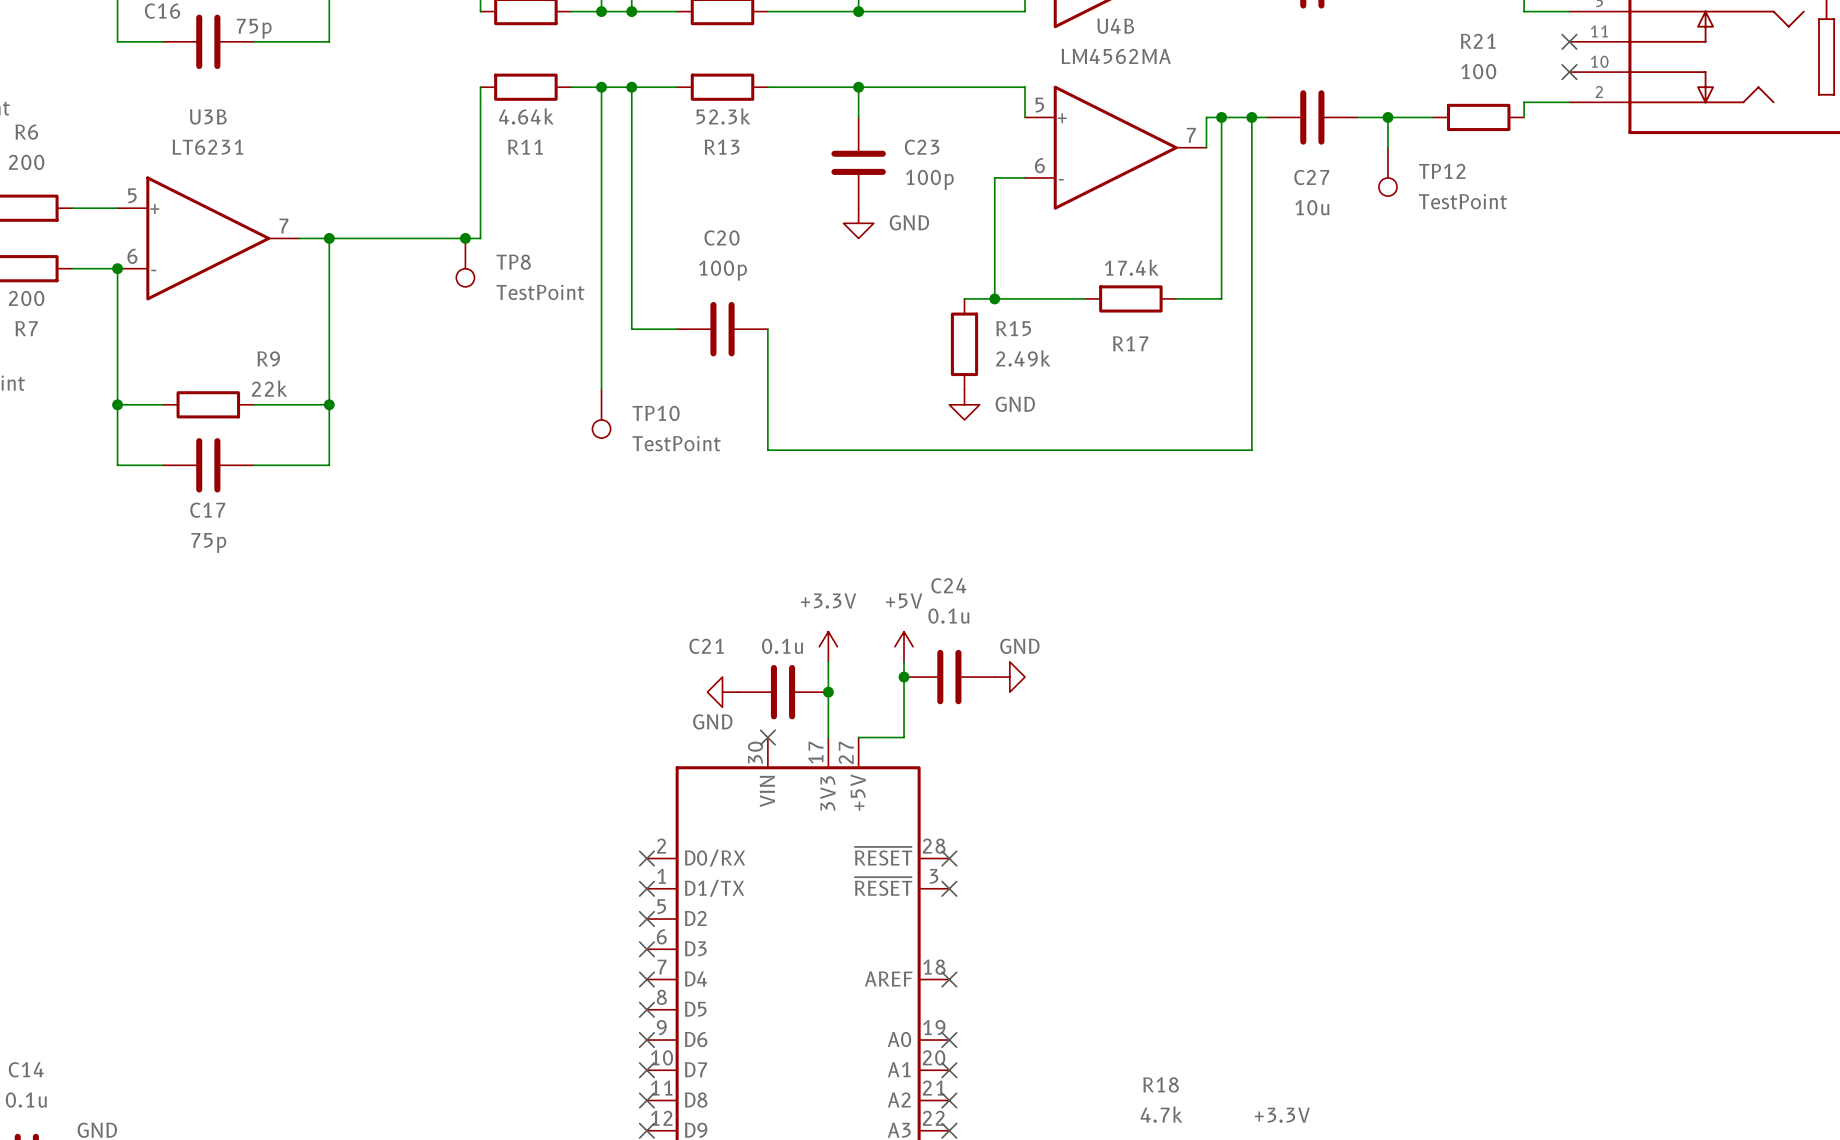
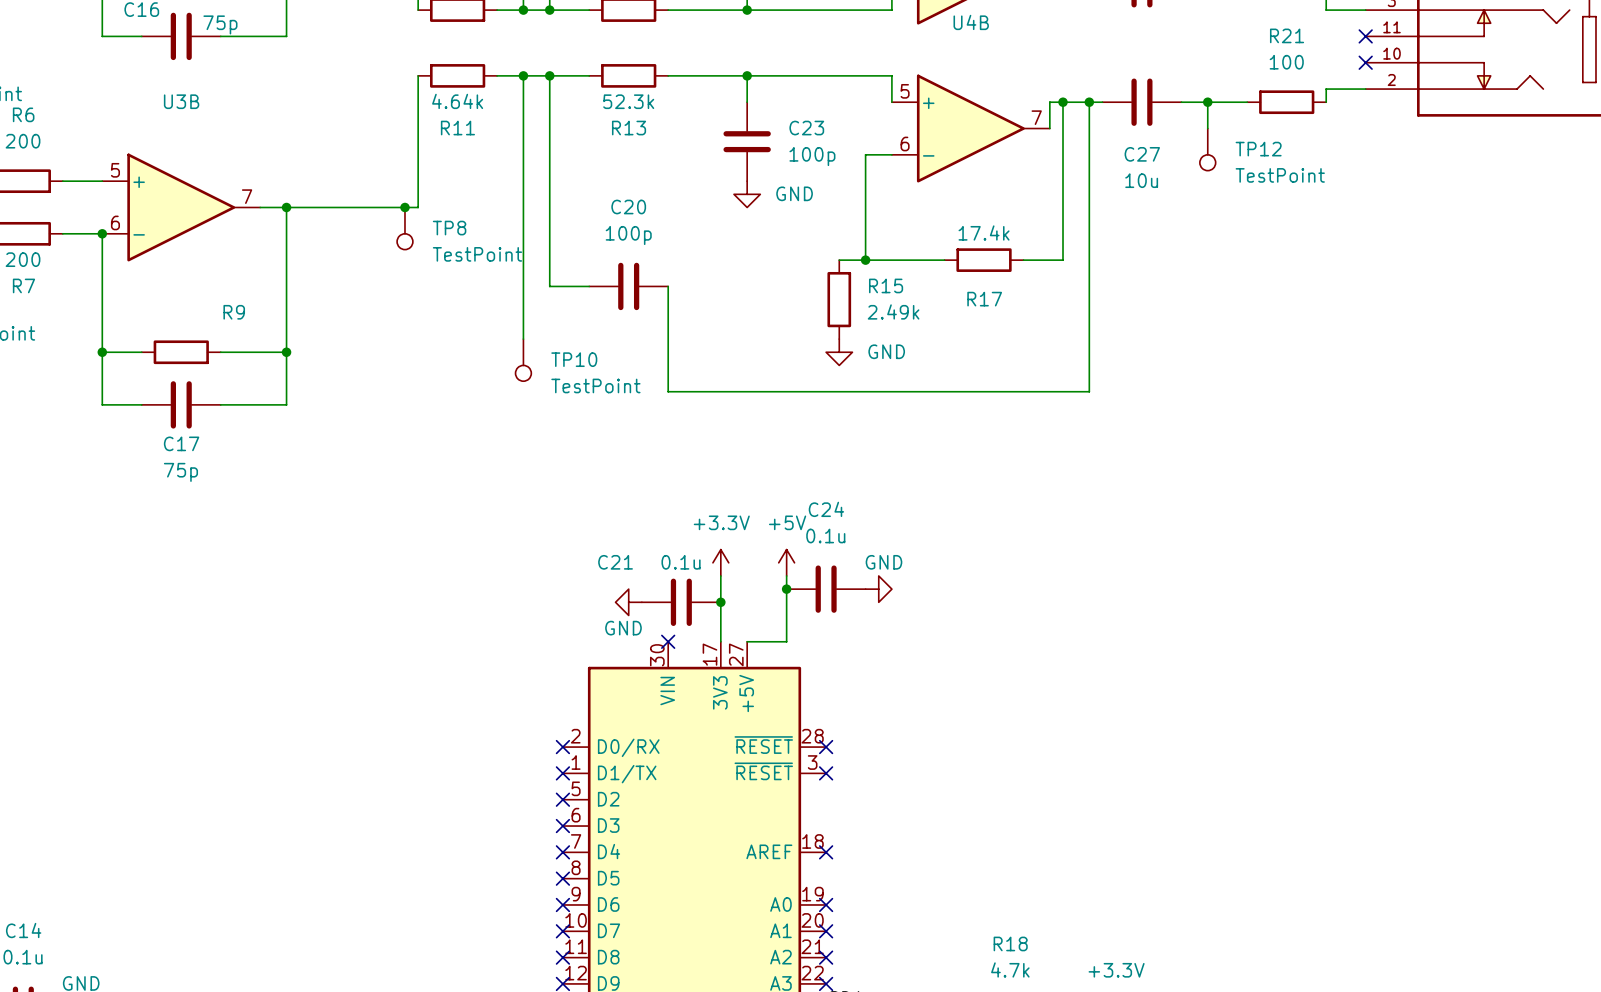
U4B value: LM4562MA (1116, 56) -> none
U3B value: LT6231 (207, 147) -> none
R9 value: 22k (269, 388) -> none

